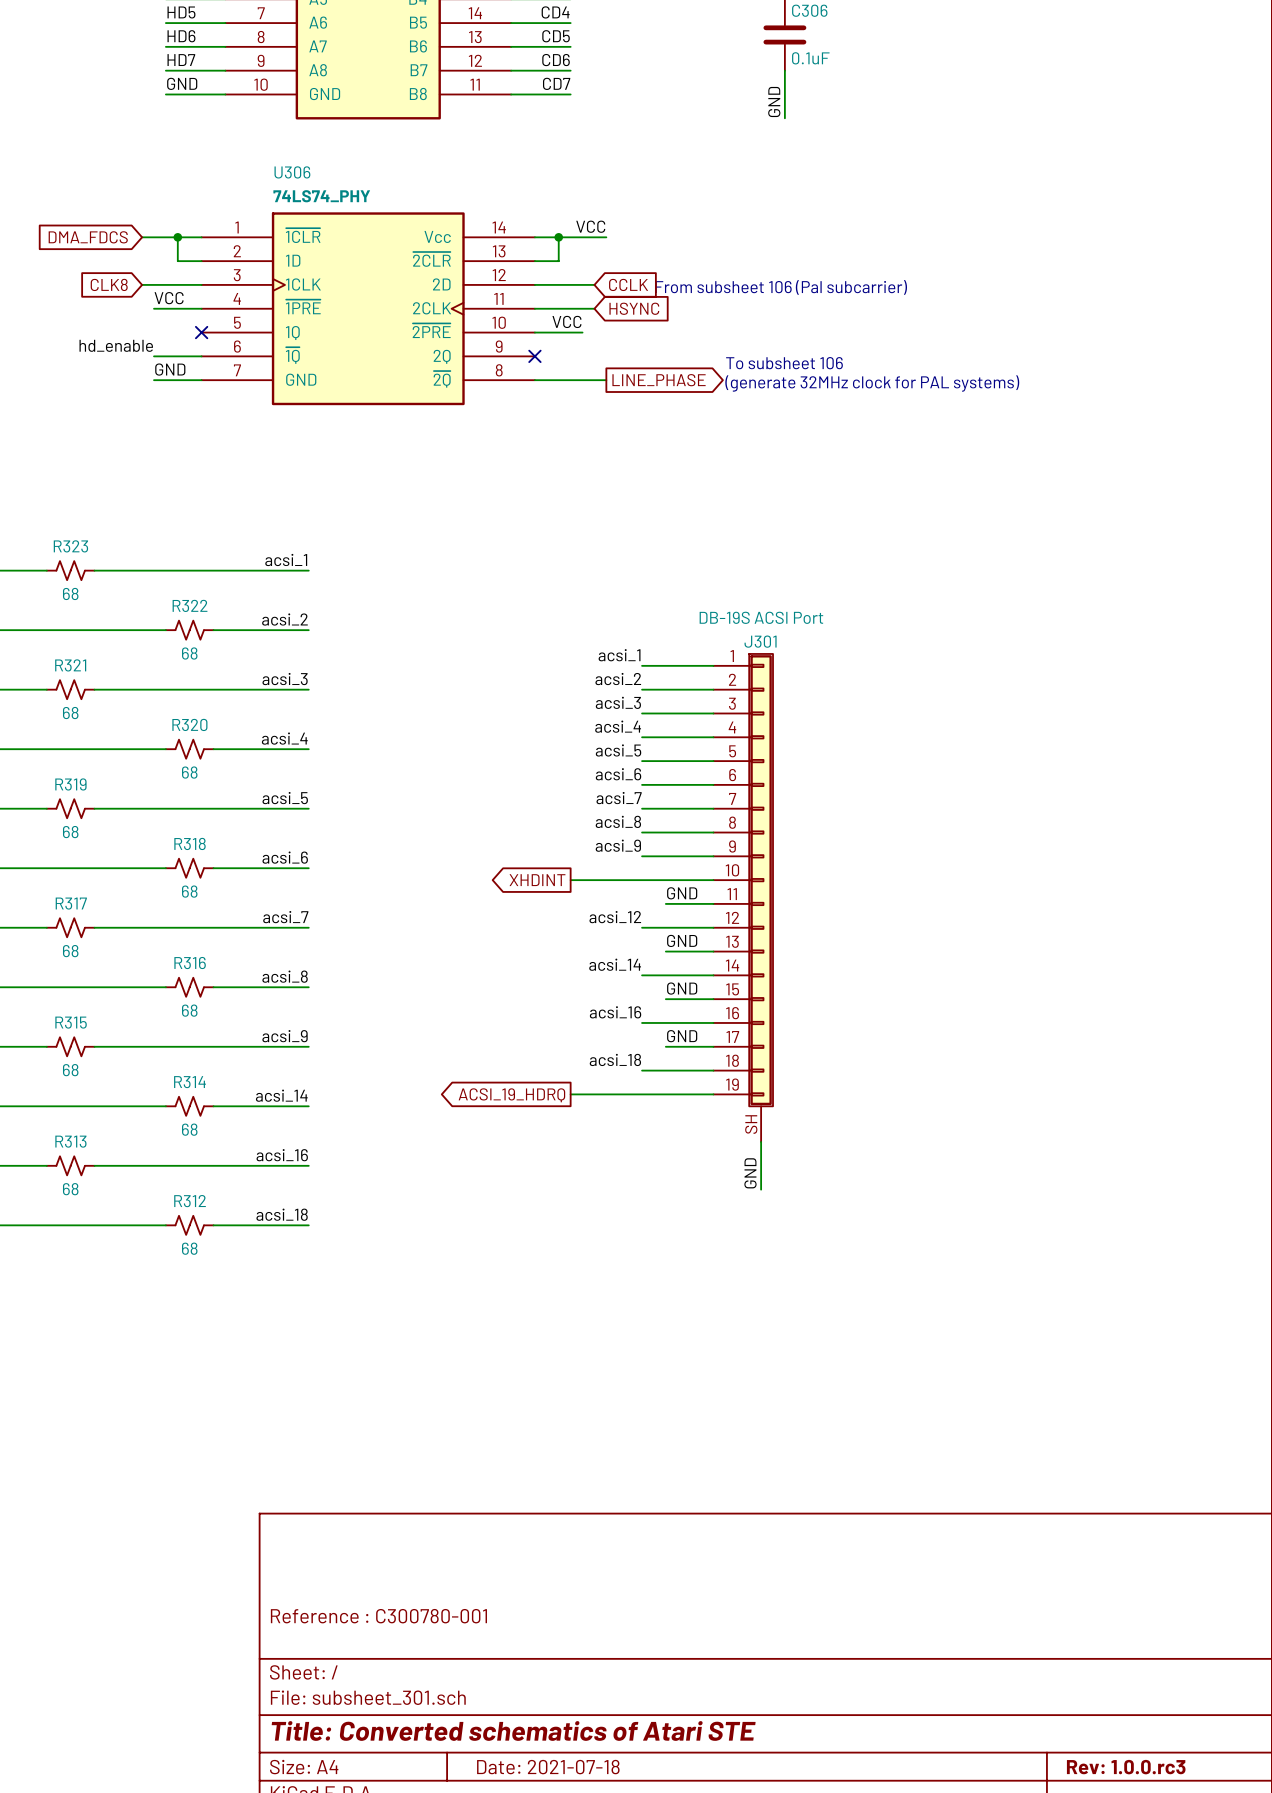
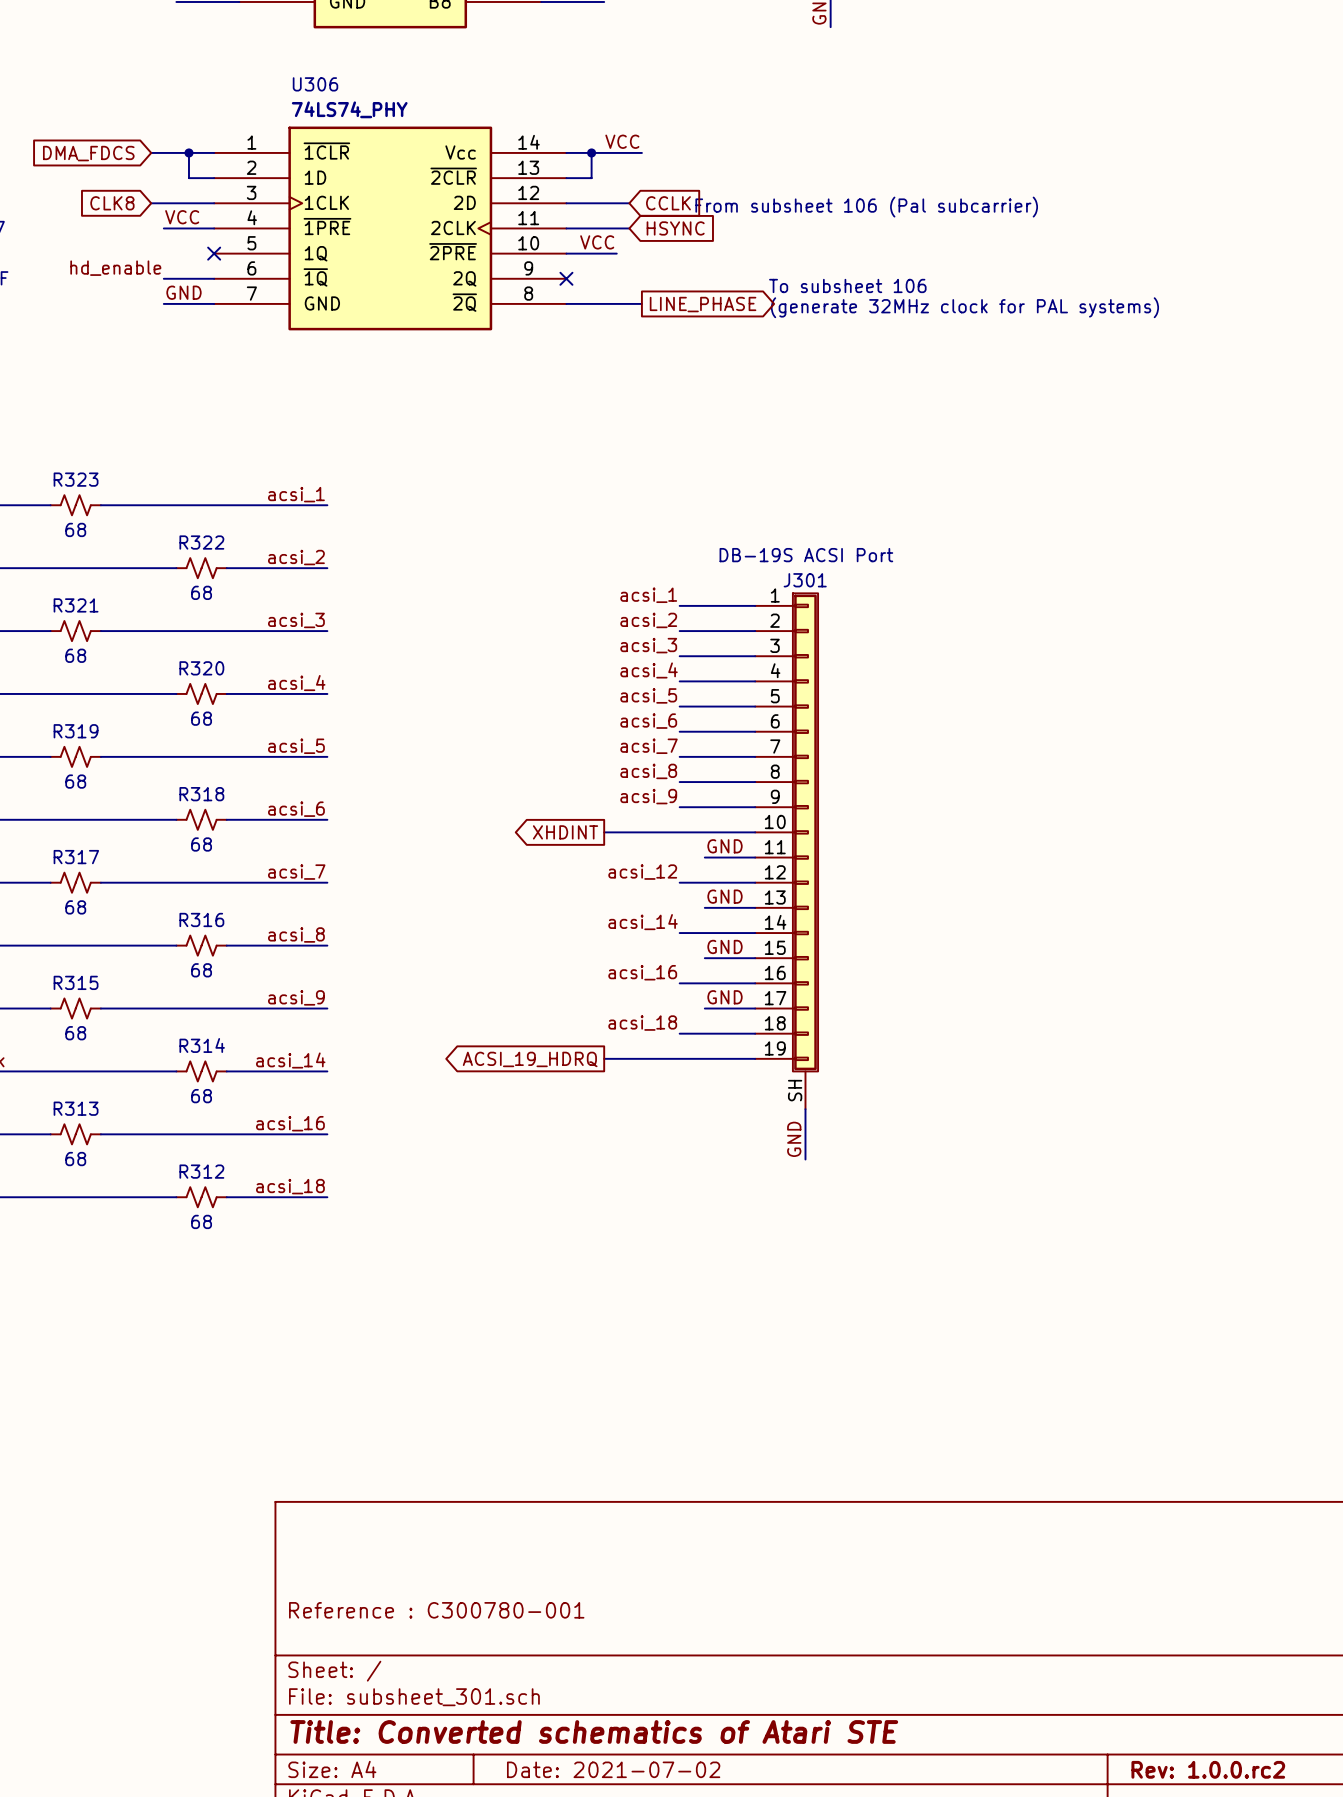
title block: Date: 2021-07-18 (548, 1767) -> Date: 2021-07-02 (613, 1769)
title block: Rev: 1.0.0.rc3 (1126, 1767) -> Rev: 1.0.0.rc2 (1208, 1769)

